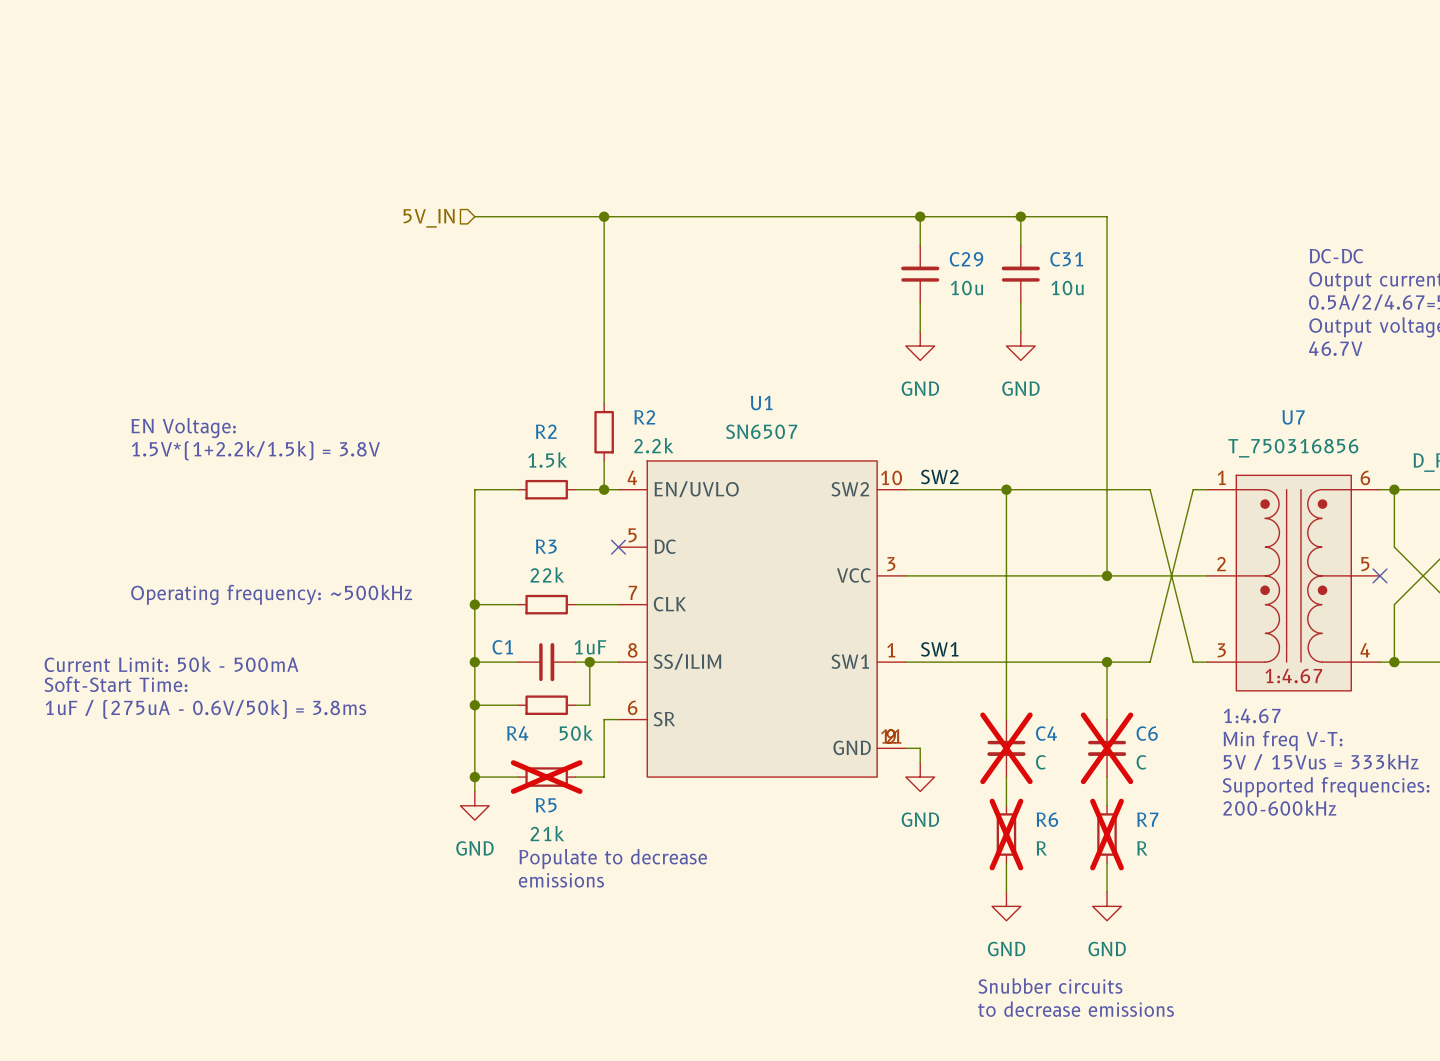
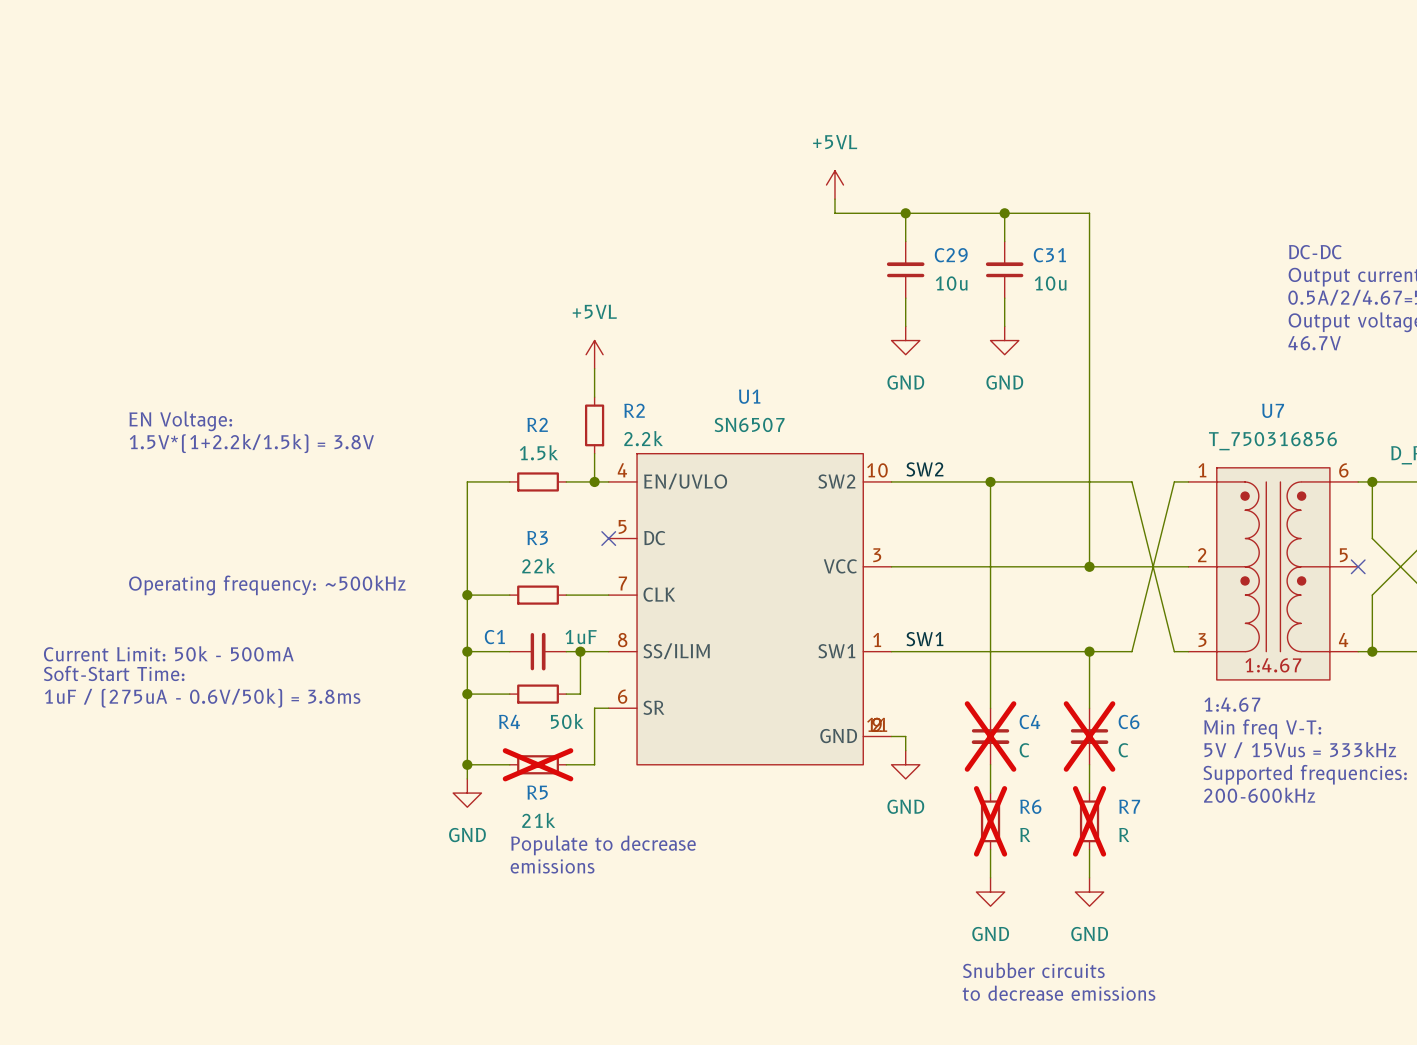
power symbol: none -> +5VL (834, 185)
wire: (474, 216) (848, 216) -> (834, 199) (834, 213)
wire: (604, 216) (604, 374) -> none
junction: (604, 216) -> none
hierarchical label: 5V_IN (429, 218) -> none
power symbol: none -> +5VL (594, 354)

